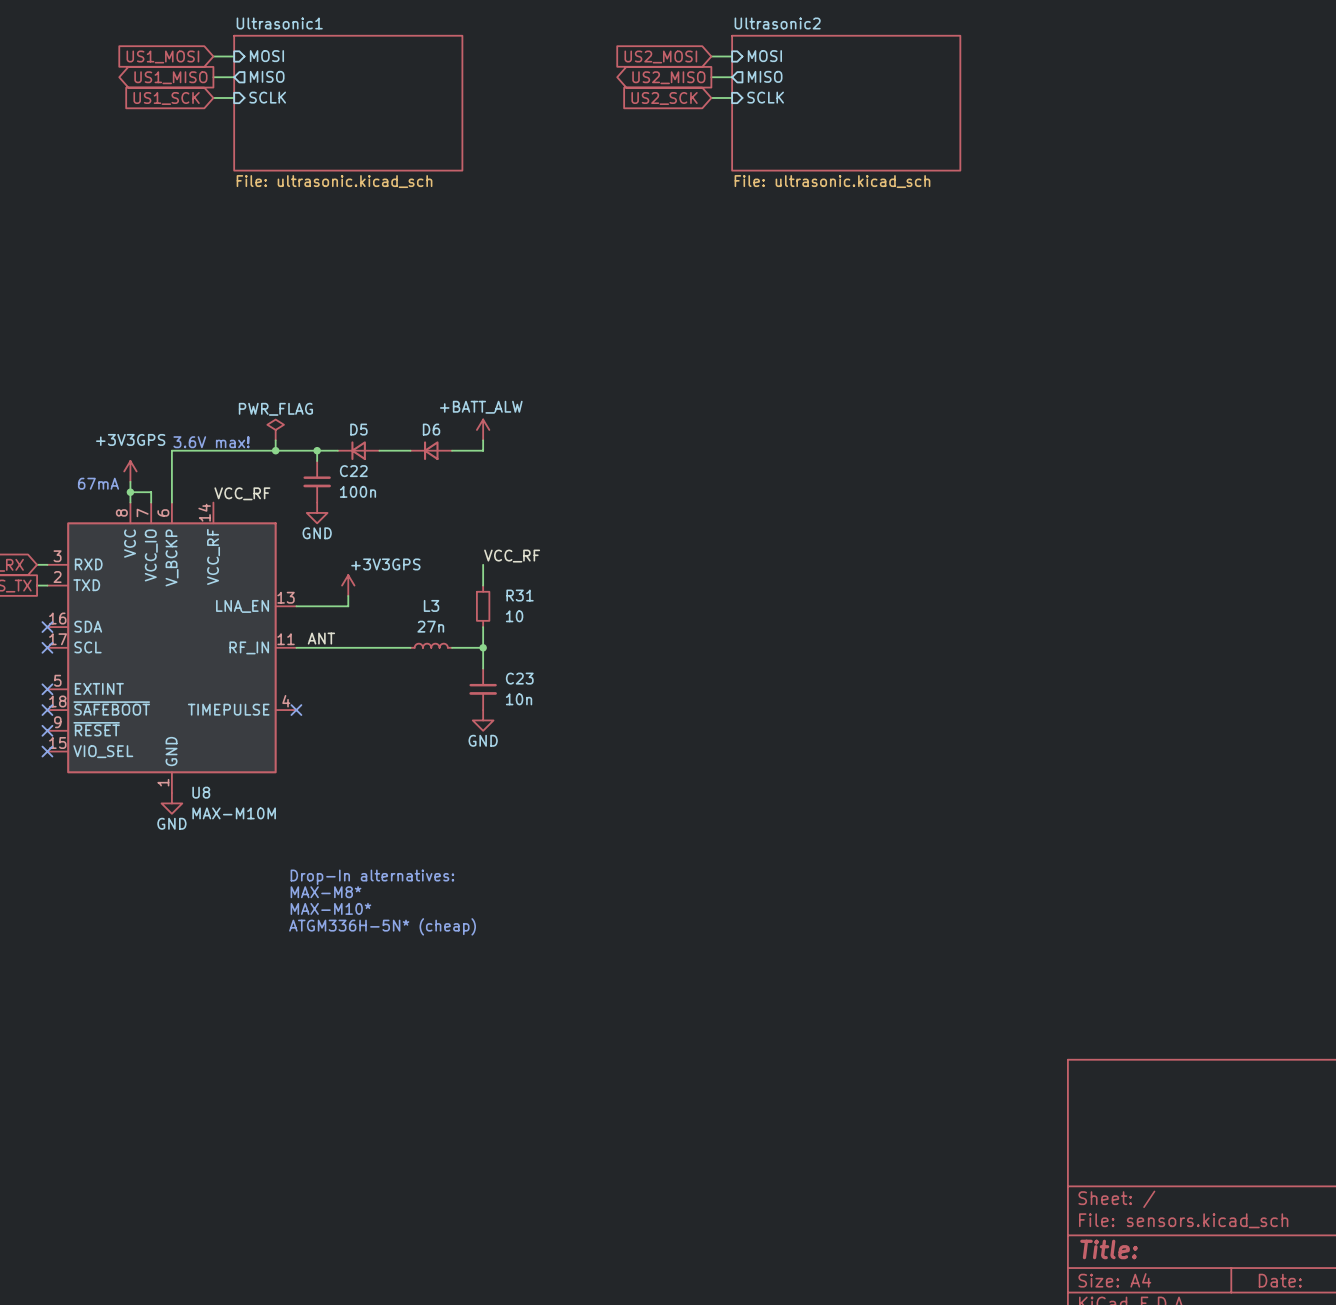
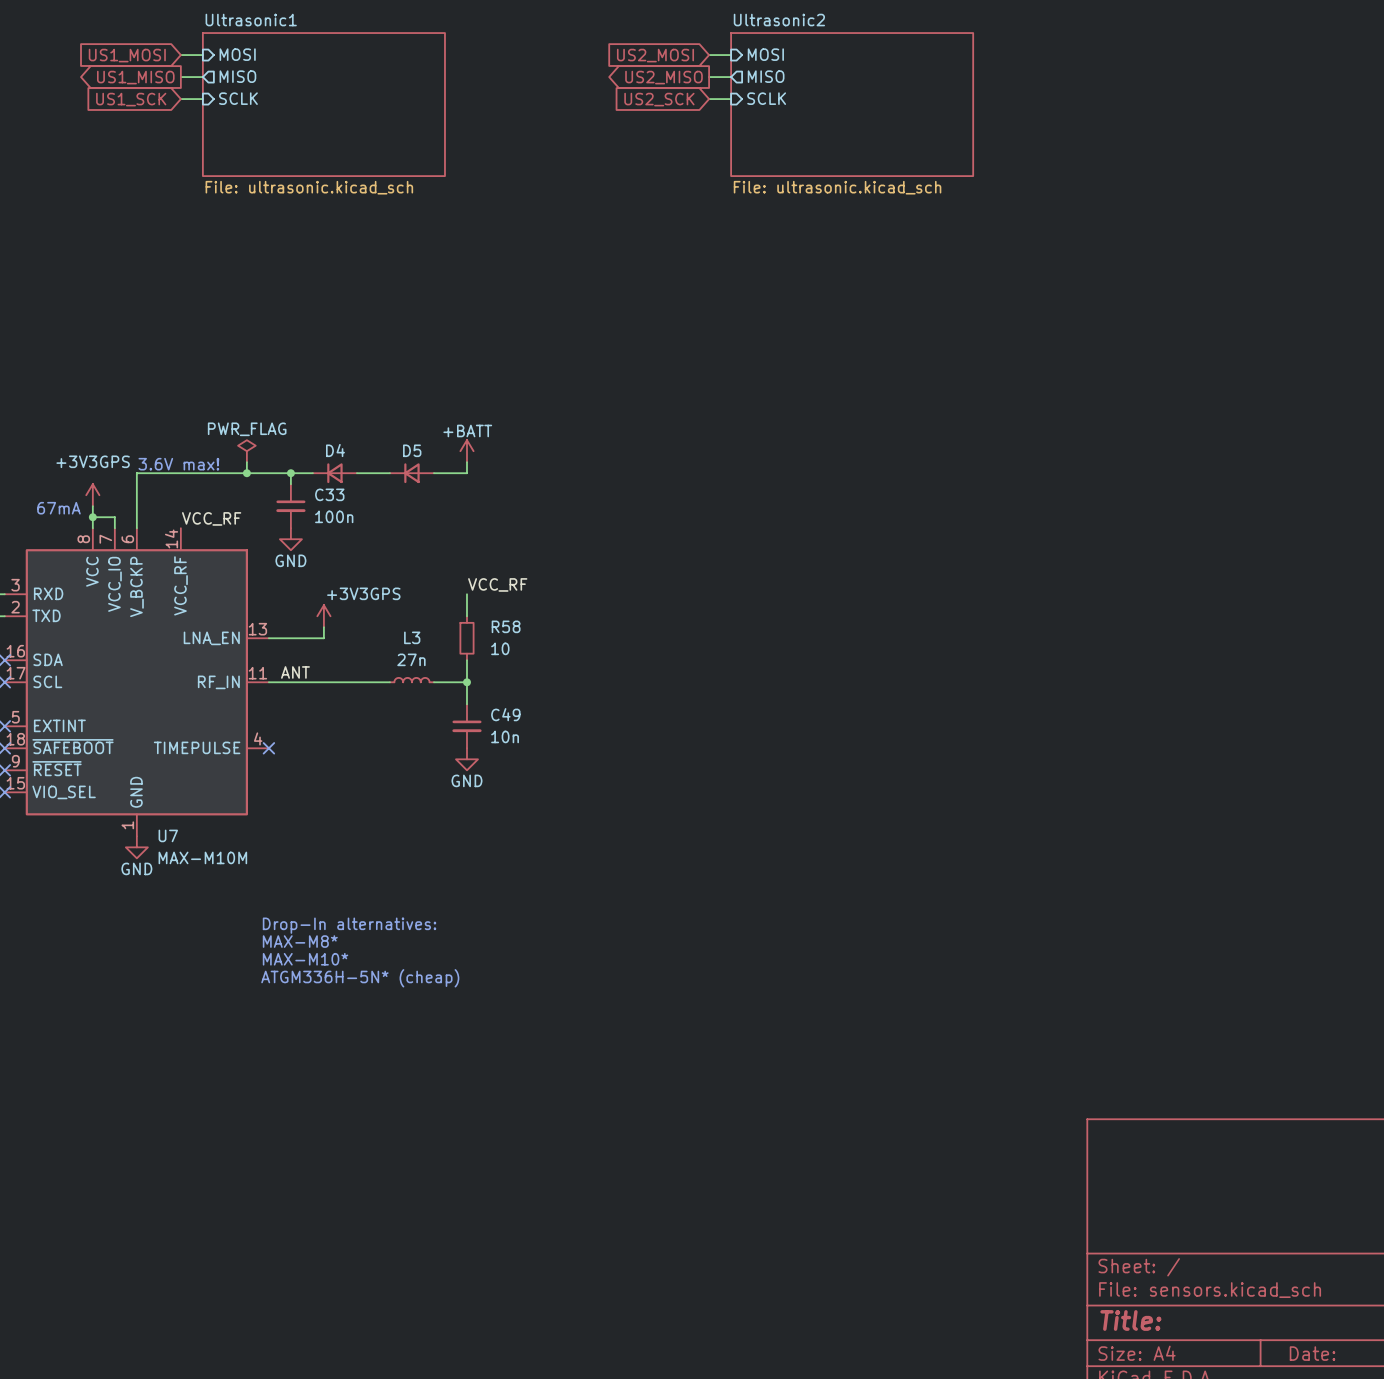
D5 name: D5 (358, 429) -> D4 (335, 450)
D6 name: D6 (431, 429) -> D5 (412, 450)
power symbol: +BATT_ALW (483, 429) -> +BATT (466, 451)
C22 name: C22 (353, 471) -> C33 (329, 494)
R31 name: R31 (520, 595) -> R58 (506, 626)
C23 name: C23 (519, 678) -> C49 (505, 714)
U8 name: U8 (201, 792) -> U7 (168, 835)

